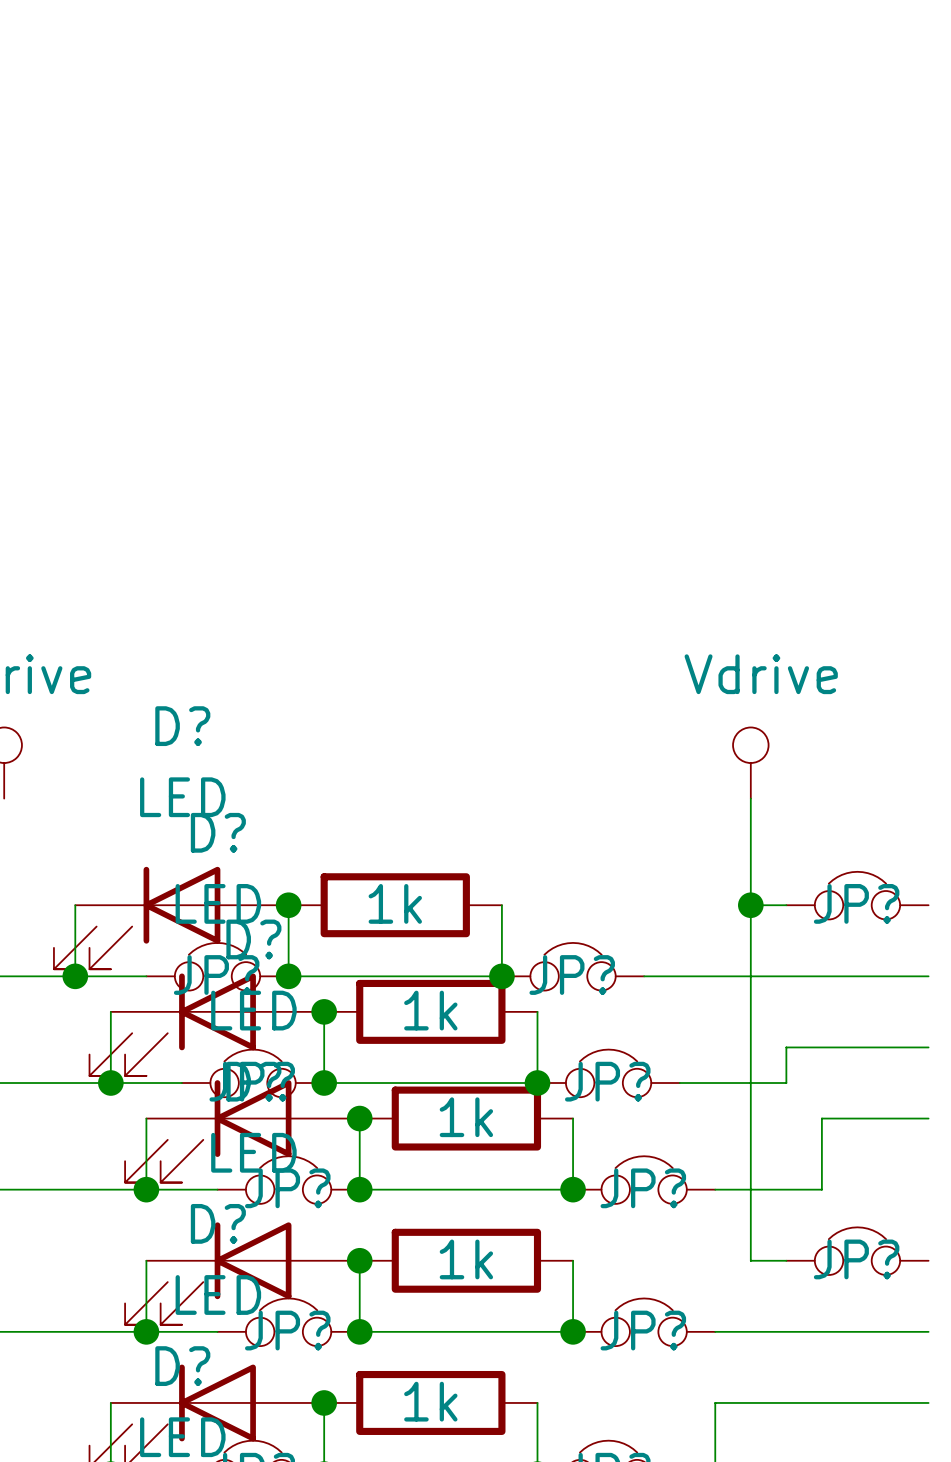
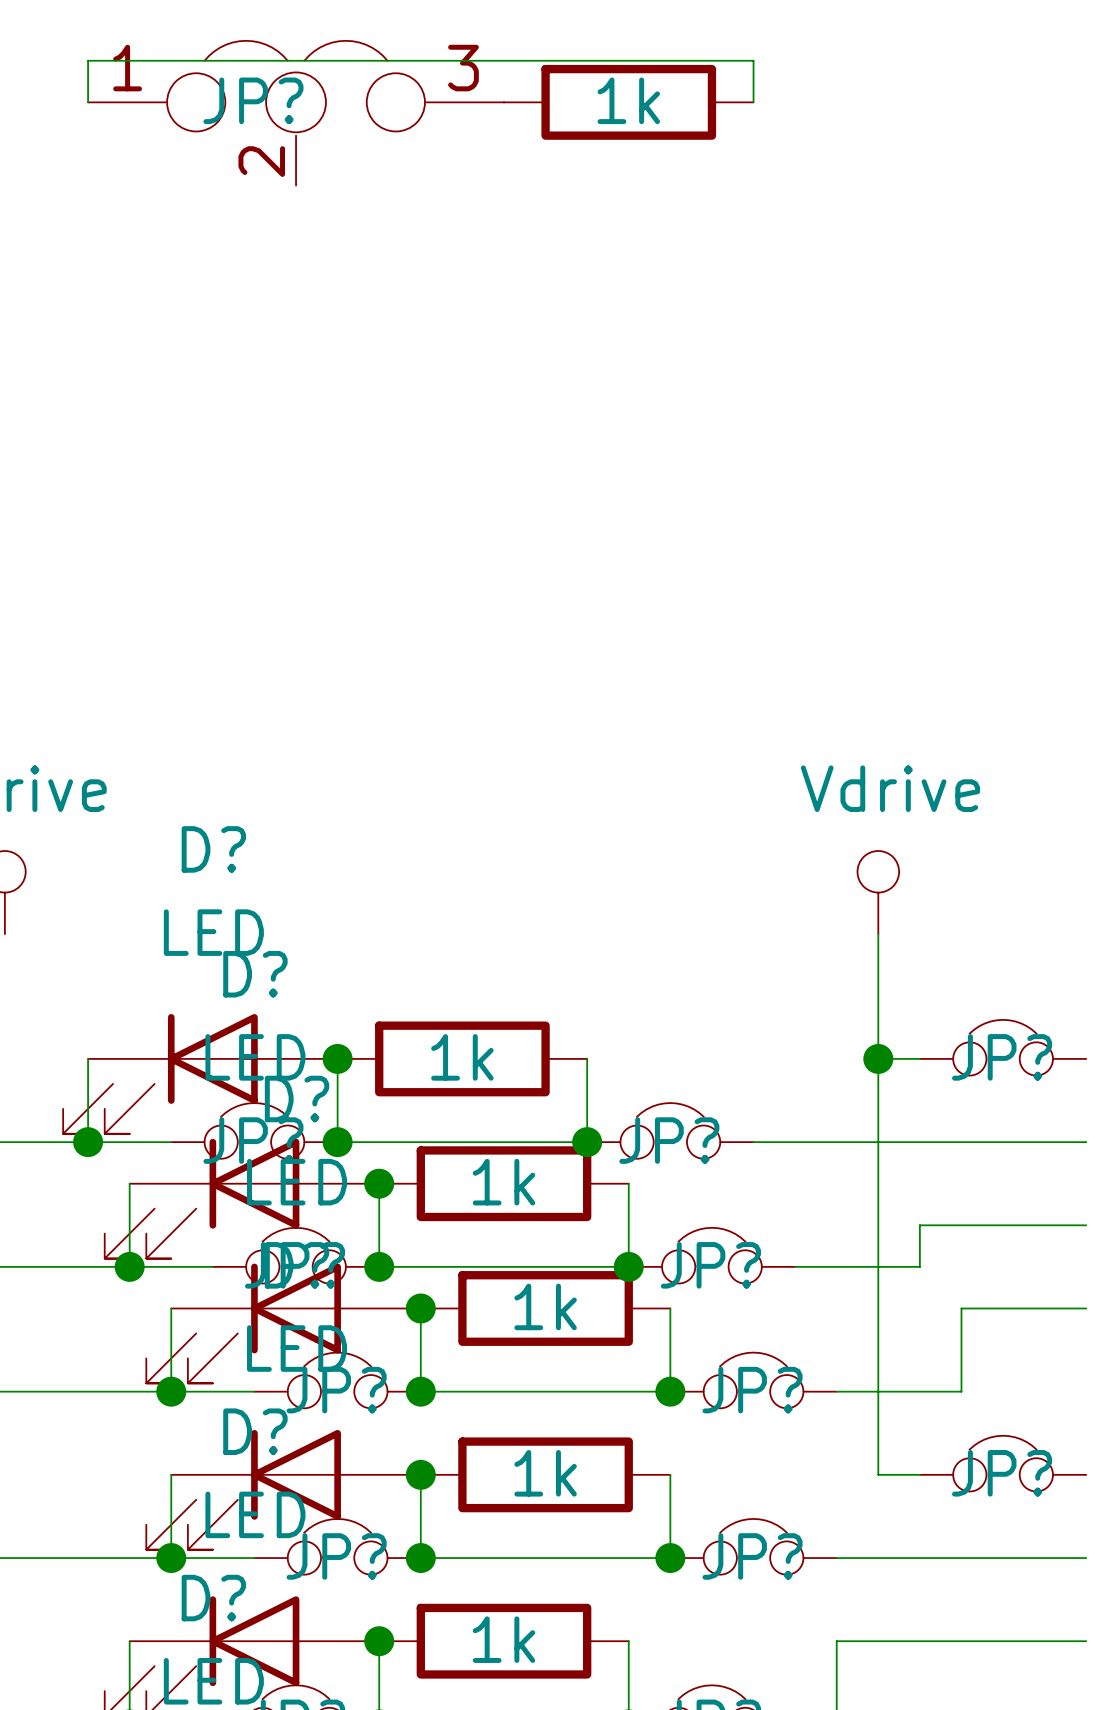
wire: none -> (88, 102) (88, 60) (753, 60) (753, 102)
part: none -> 1k (628, 102)
JP?: none -> (296, 113)

